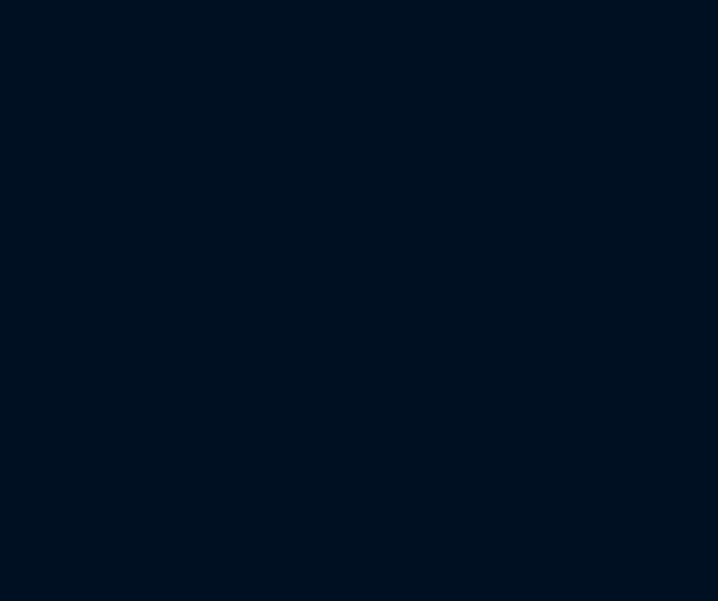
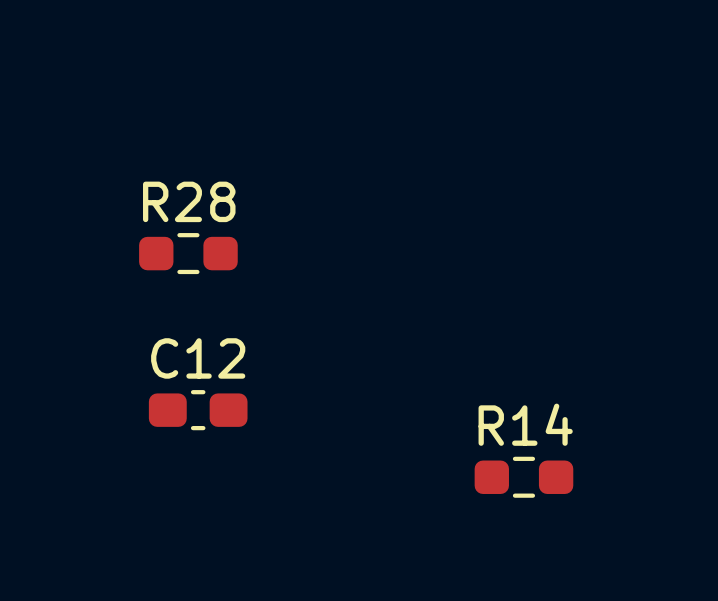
R28: none -> (188, 253)
C12: none -> (198, 410)
R14: none -> (523, 477)

